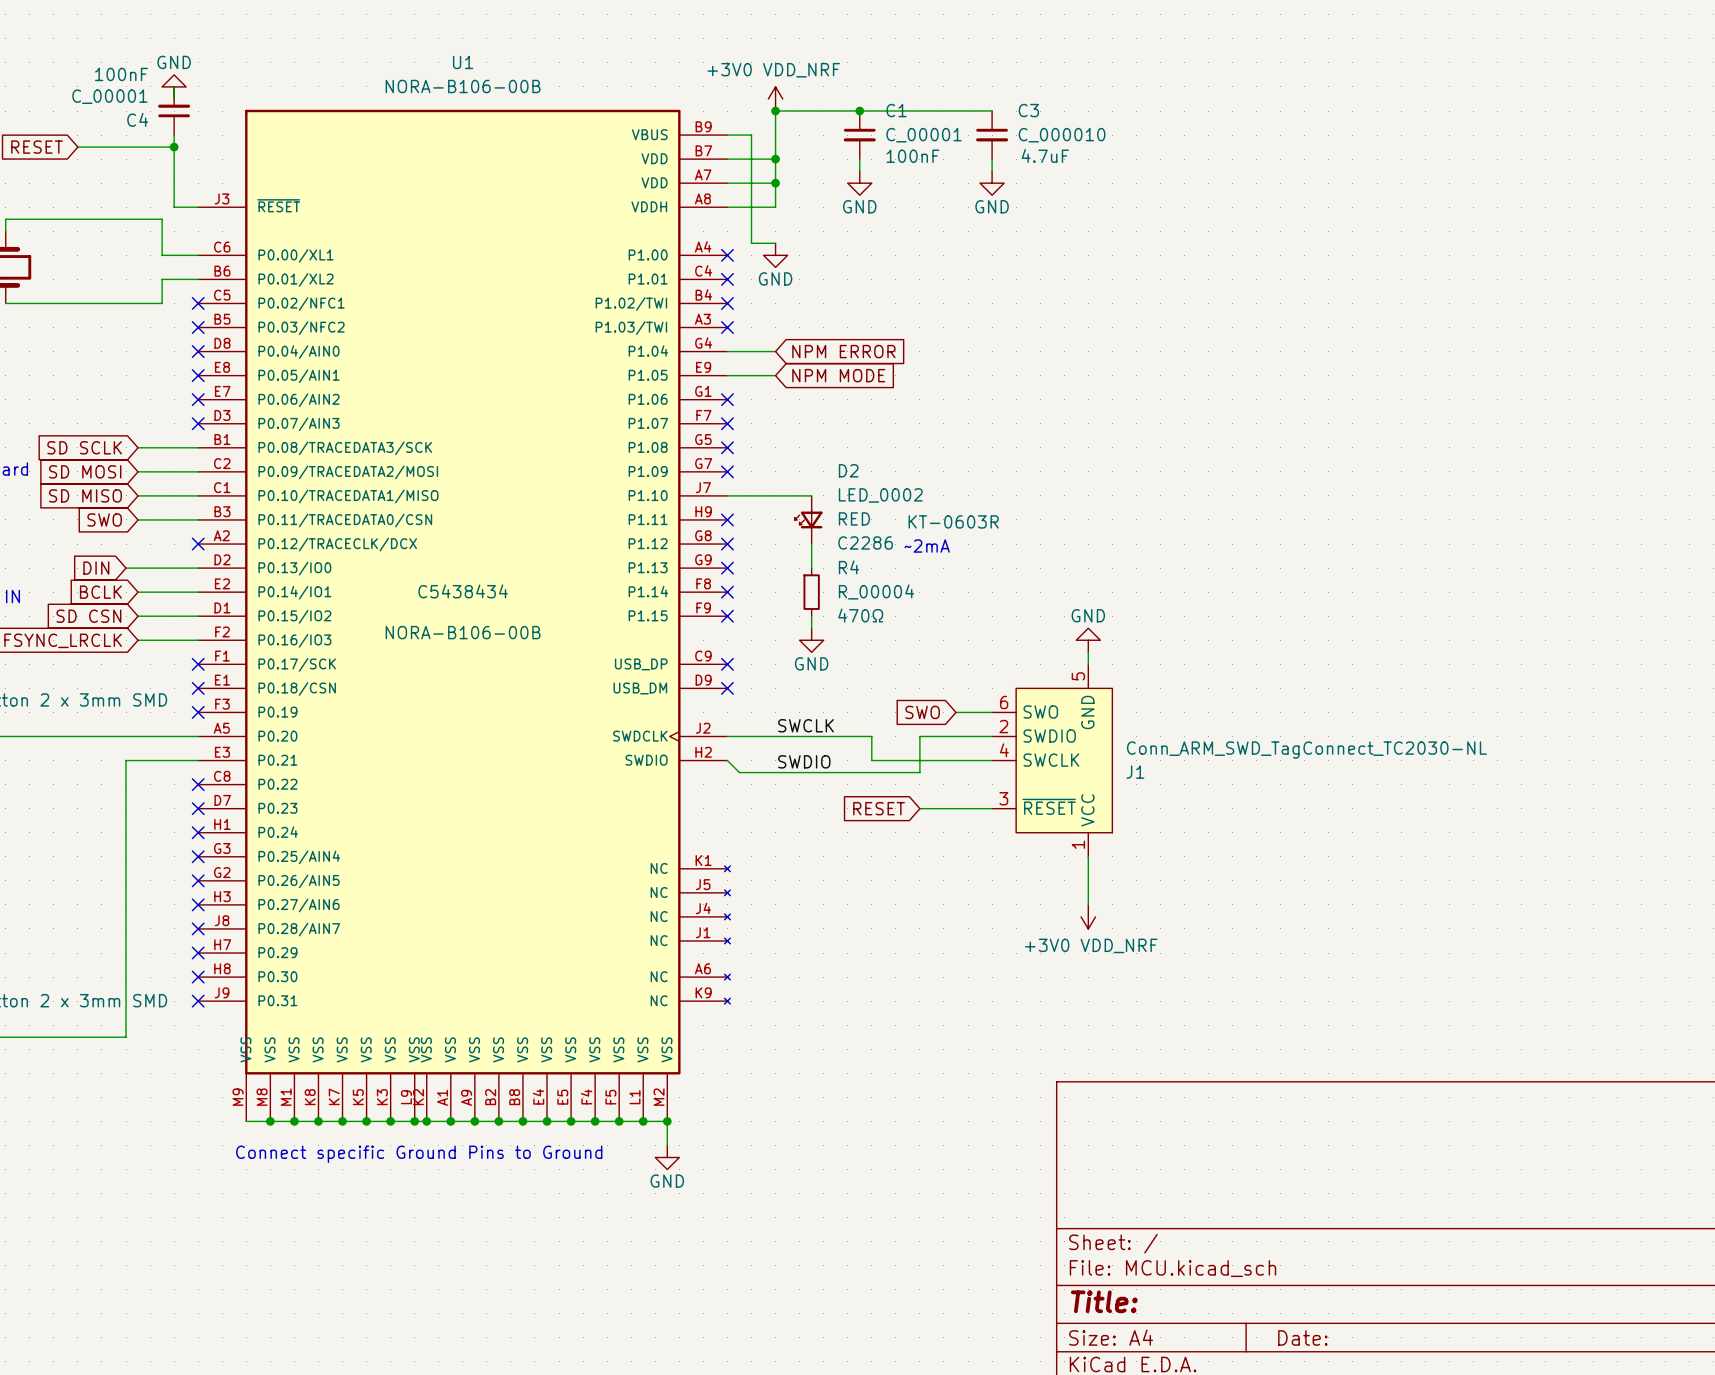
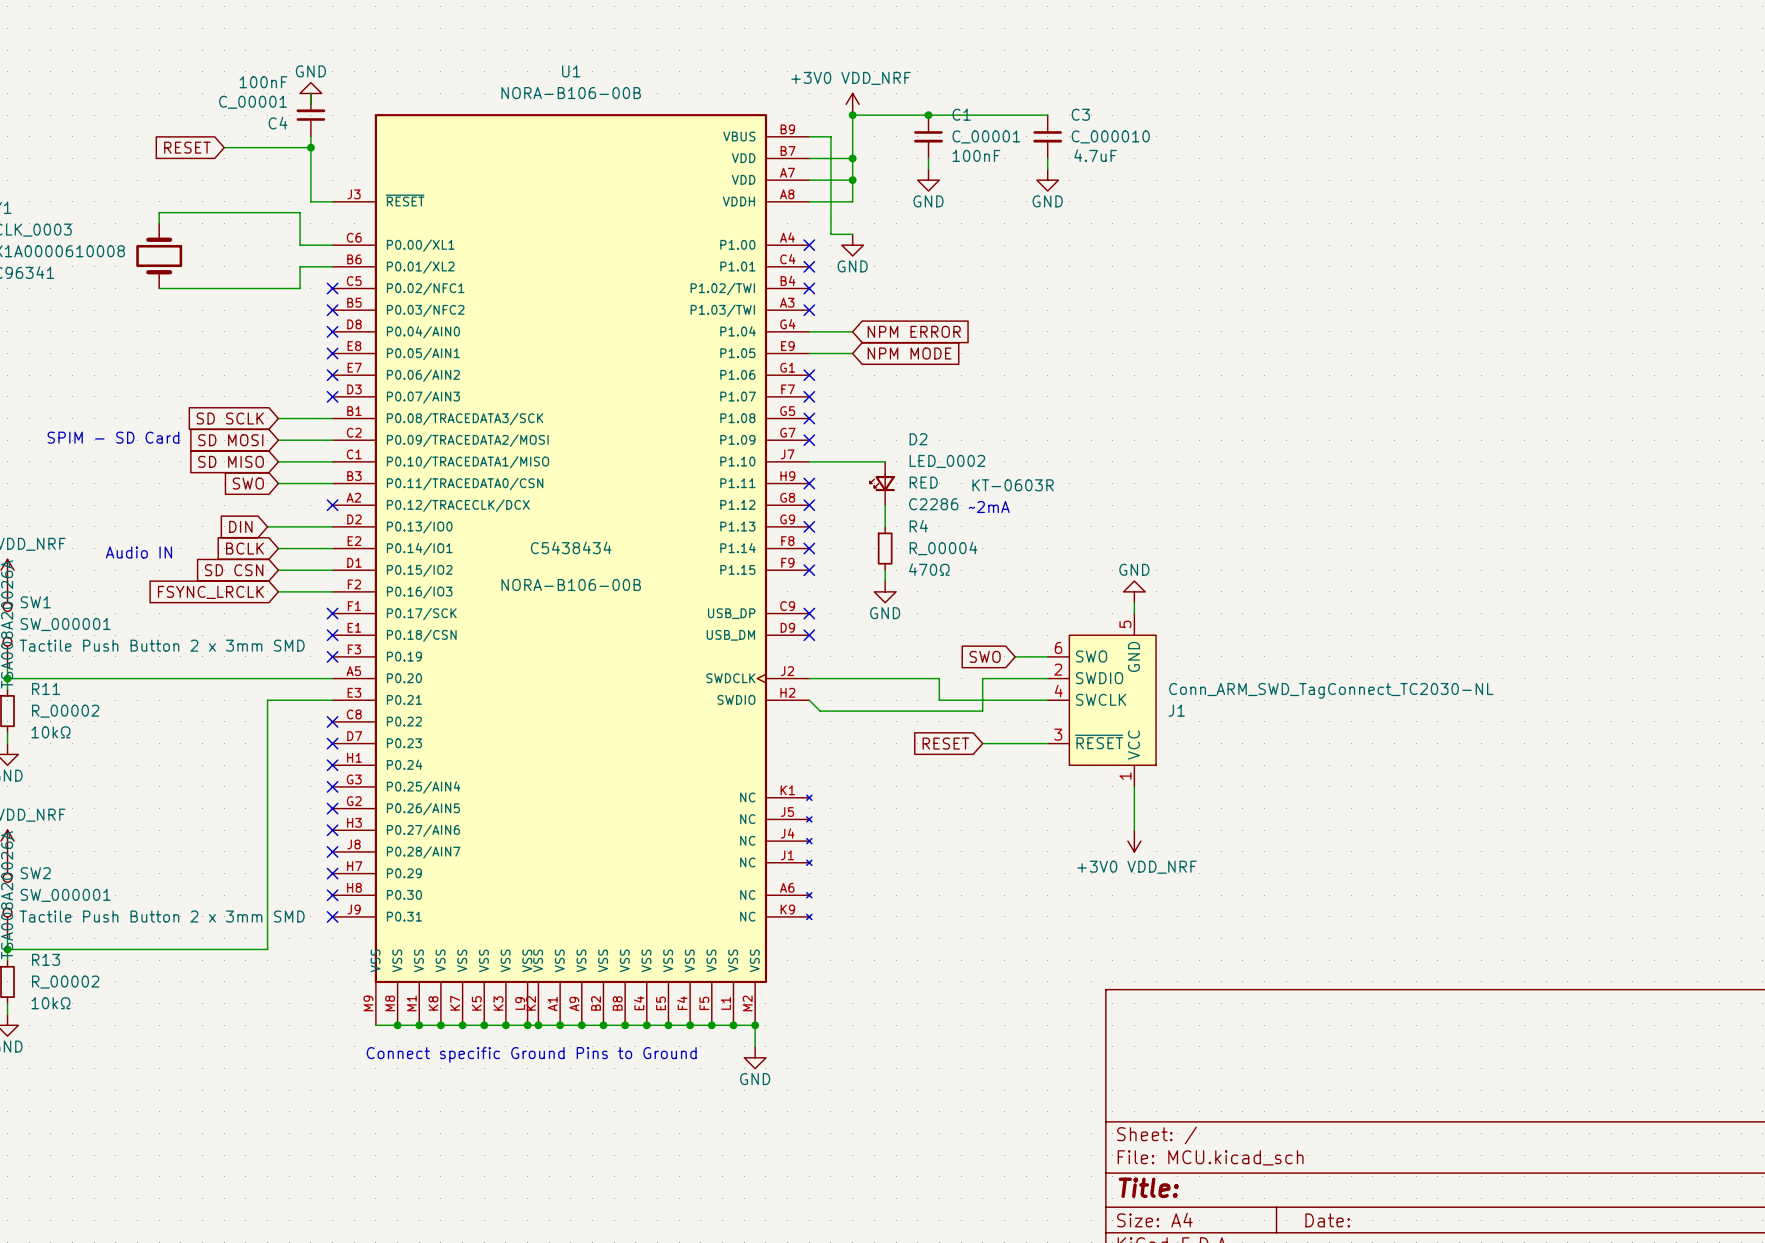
label: SWCLK (806, 725) -> none
label: SWDIO (804, 761) -> none

